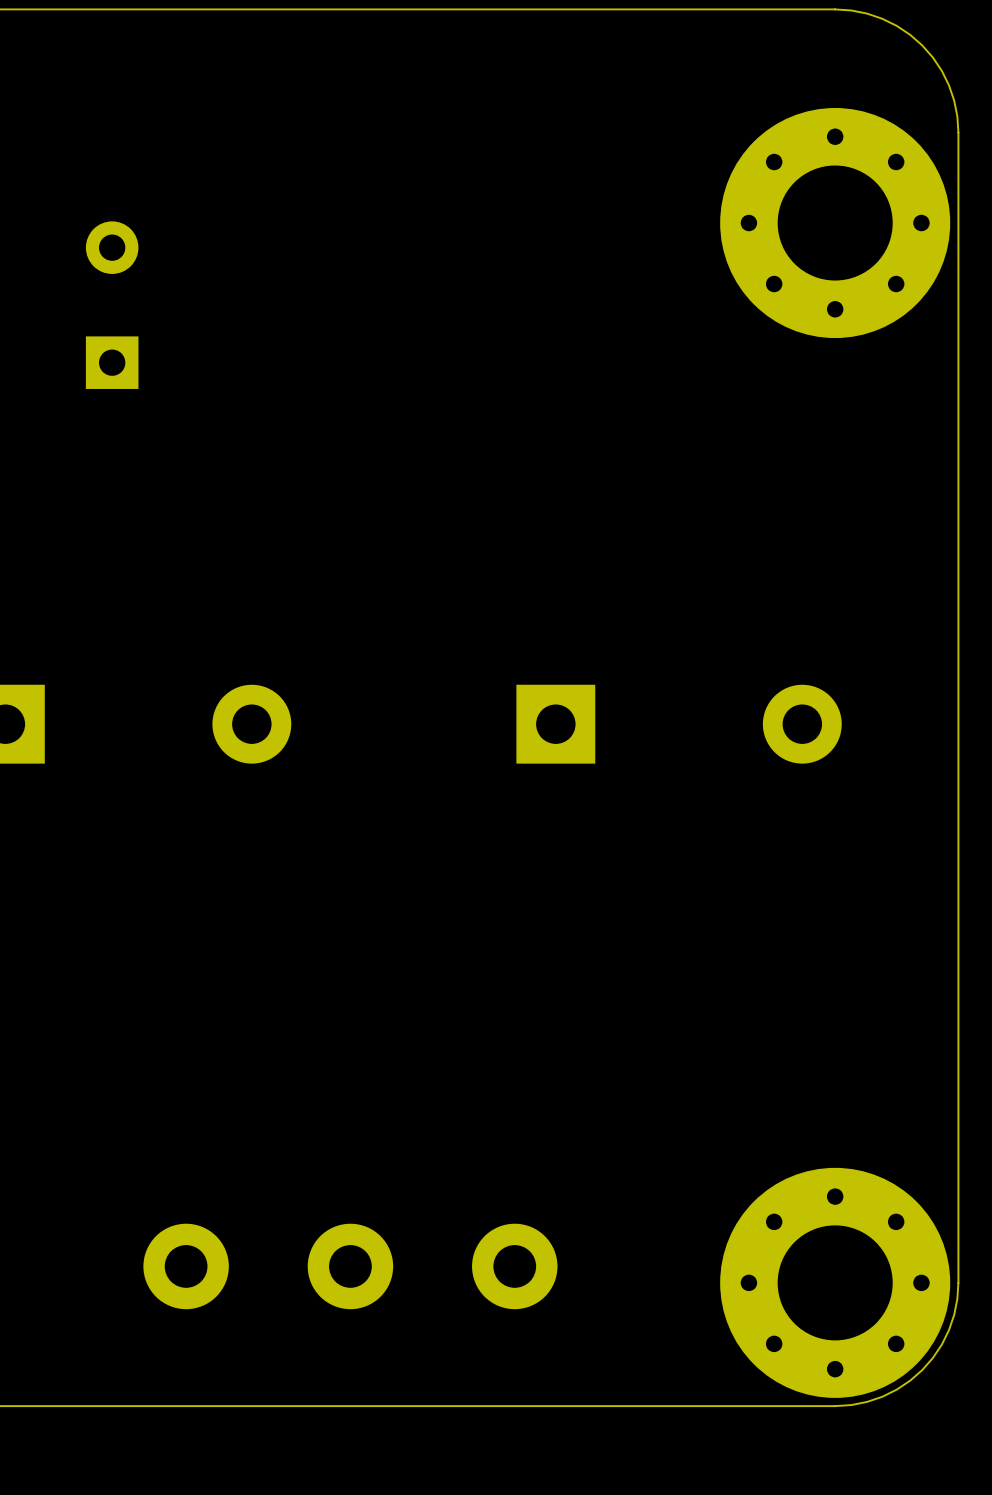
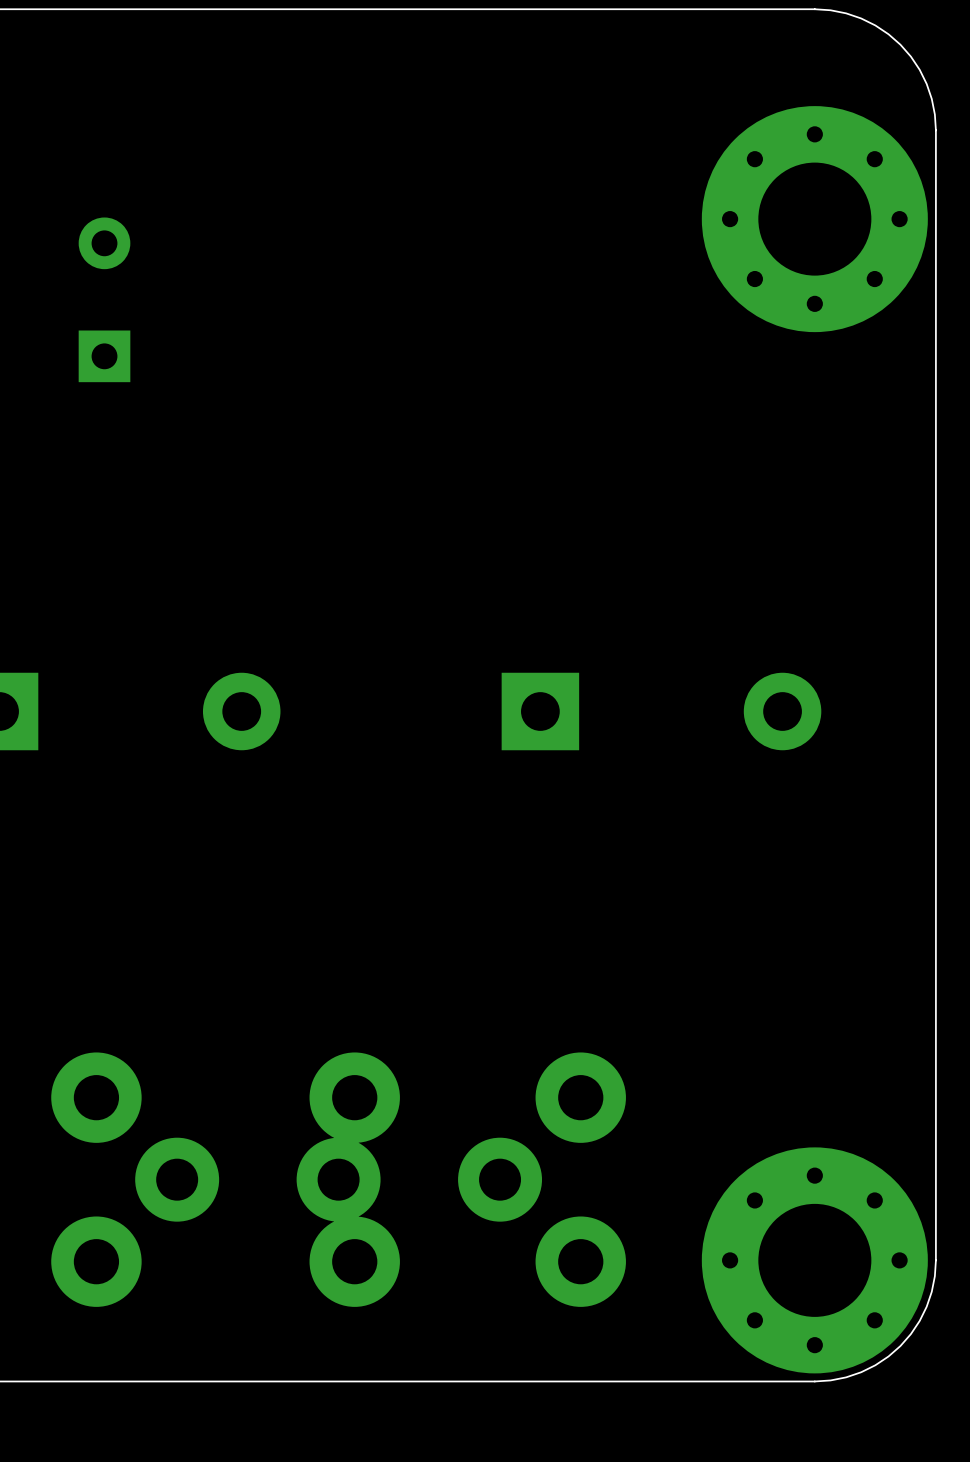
part: none -> (96, 1179)
part: none -> (354, 1179)
part: none -> (580, 1179)
part position: (350, 1266) -> (338, 1179)

